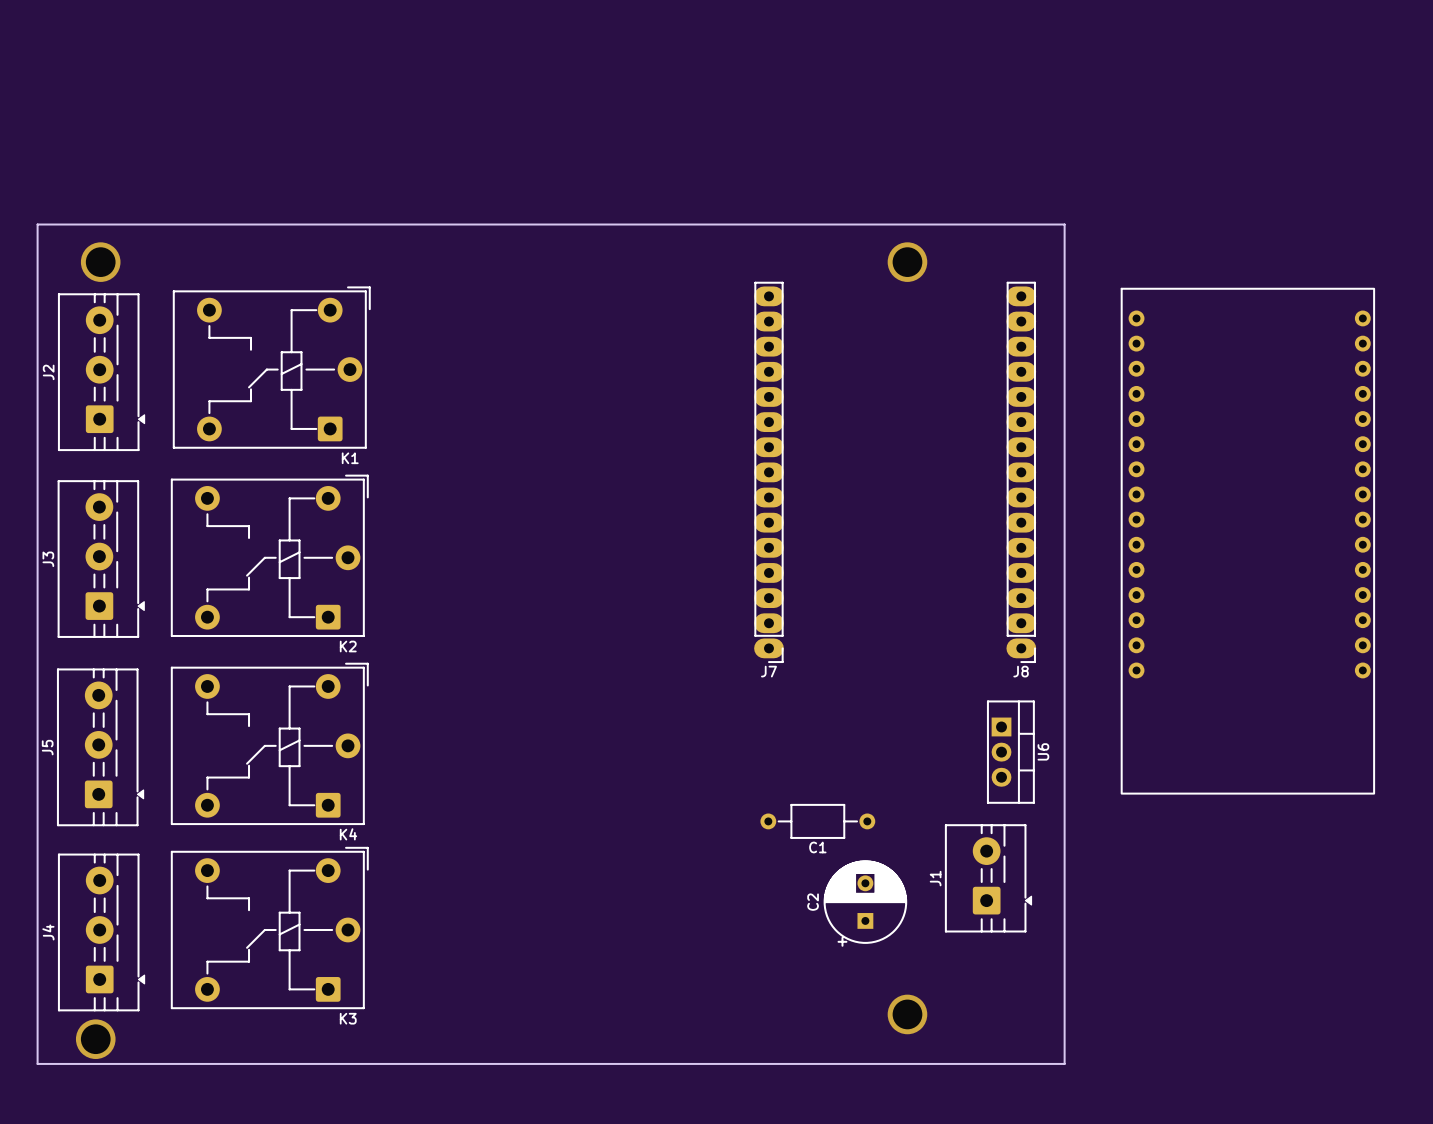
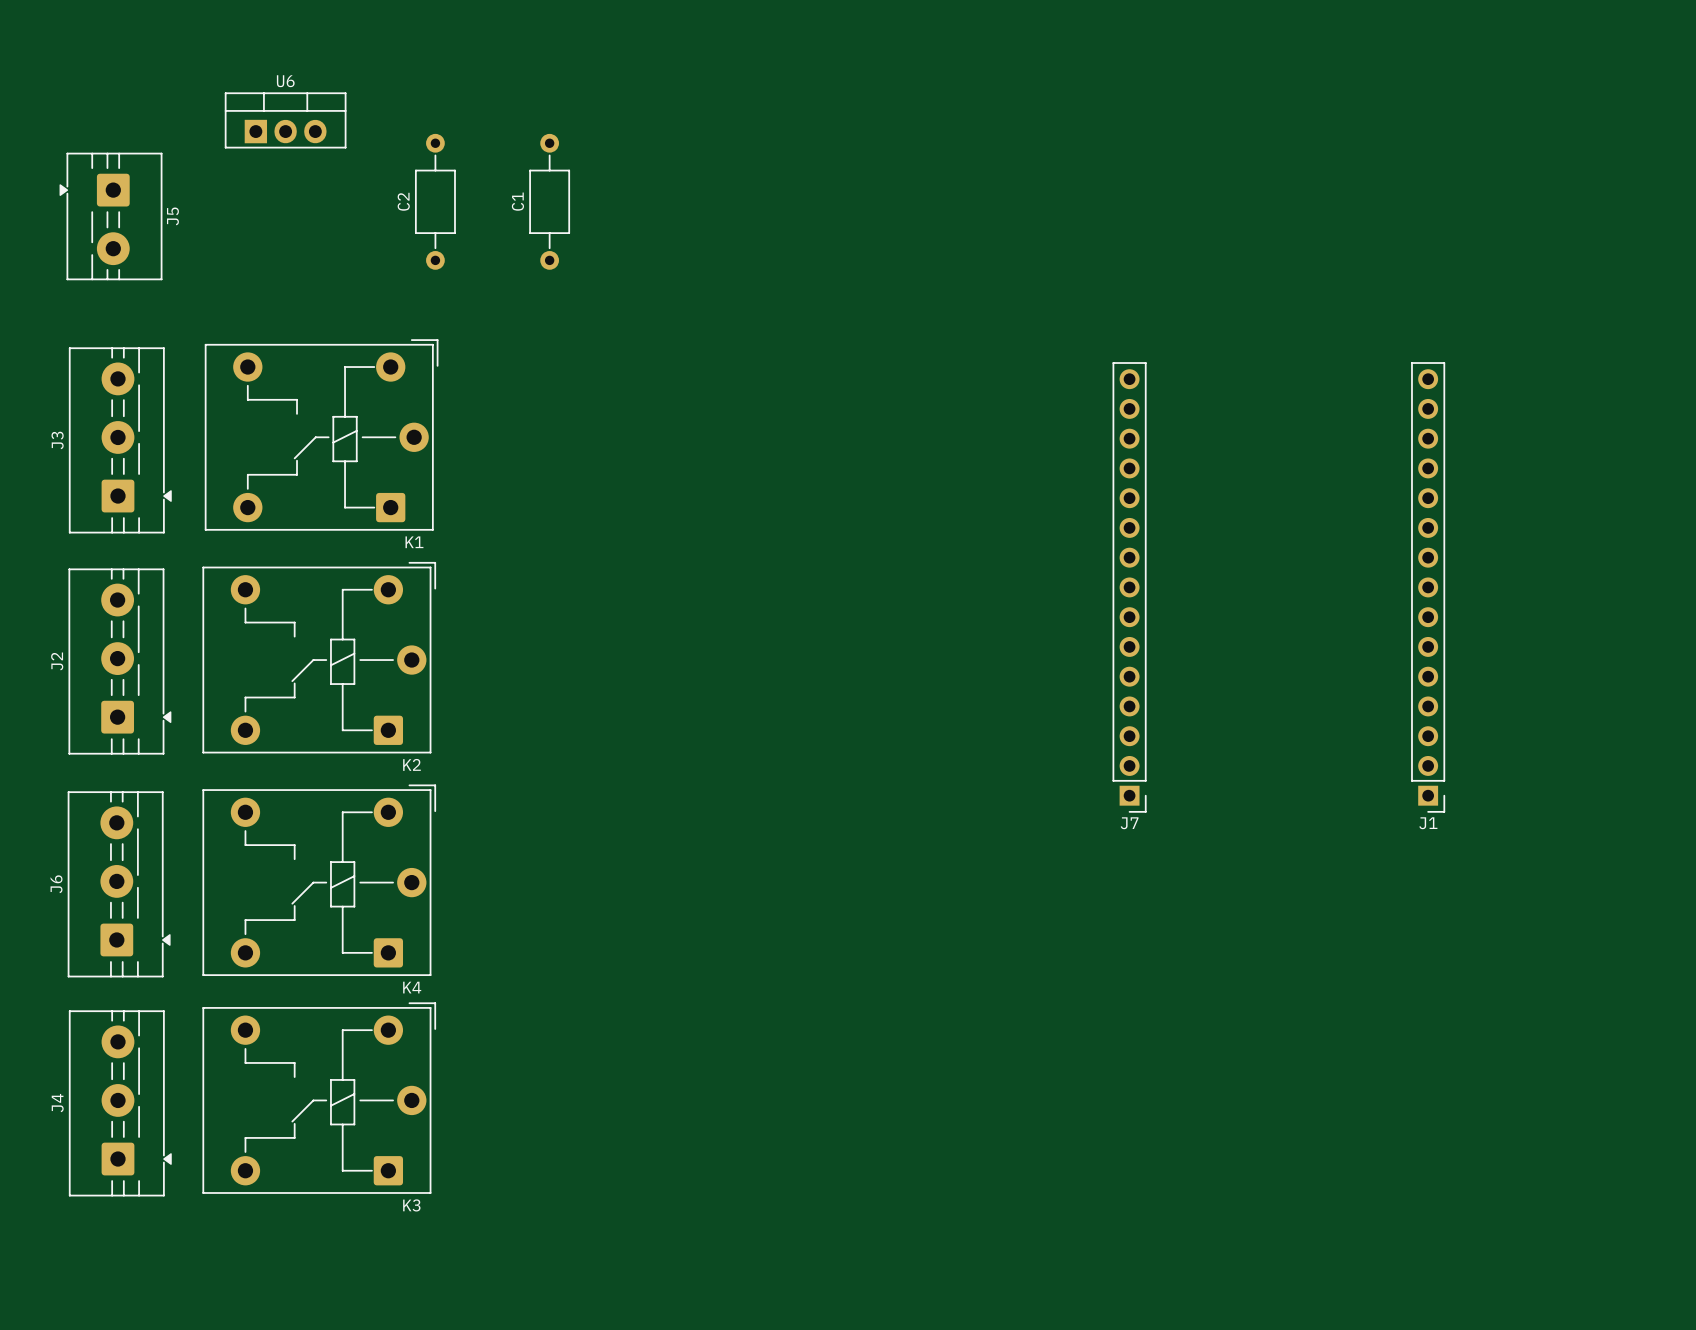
J5: none -> (110, 216)
board edge: (37, 224) (1064, 224) (1064, 1063) (37, 1063) (37, 224) -> none
via: (100, 262) -> none
via: (907, 262) -> none
J7 footprint: [754, 282, 784, 663] -> [1112, 362, 1147, 813]
J2 name: J2 (48, 372) -> J3 (57, 440)
J8: (1021, 472) -> none
part: (1247, 541) -> none
J3 name: J3 (48, 559) -> J2 (57, 661)
J5 name: J5 (47, 747) -> J6 (56, 884)
U6 rotation: 0° (1010, 752) -> 90° counterclockwise (285, 120)
U6 position: (1010, 752) -> (285, 120)
C1 rotation: 0° (817, 821) -> 90° clockwise (549, 201)
C1 position: (817, 821) -> (549, 201)
J1 footprint: [945, 824, 1033, 933] -> [1411, 362, 1446, 813]
C2 footprint: [824, 860, 907, 947] -> [415, 133, 456, 270]
J1 name position: J1 (935, 878) -> J1 (1428, 823)
C2 name position: C2 (813, 902) -> C2 (403, 201)
via: (907, 1014) -> none
via: (95, 1039) -> none

